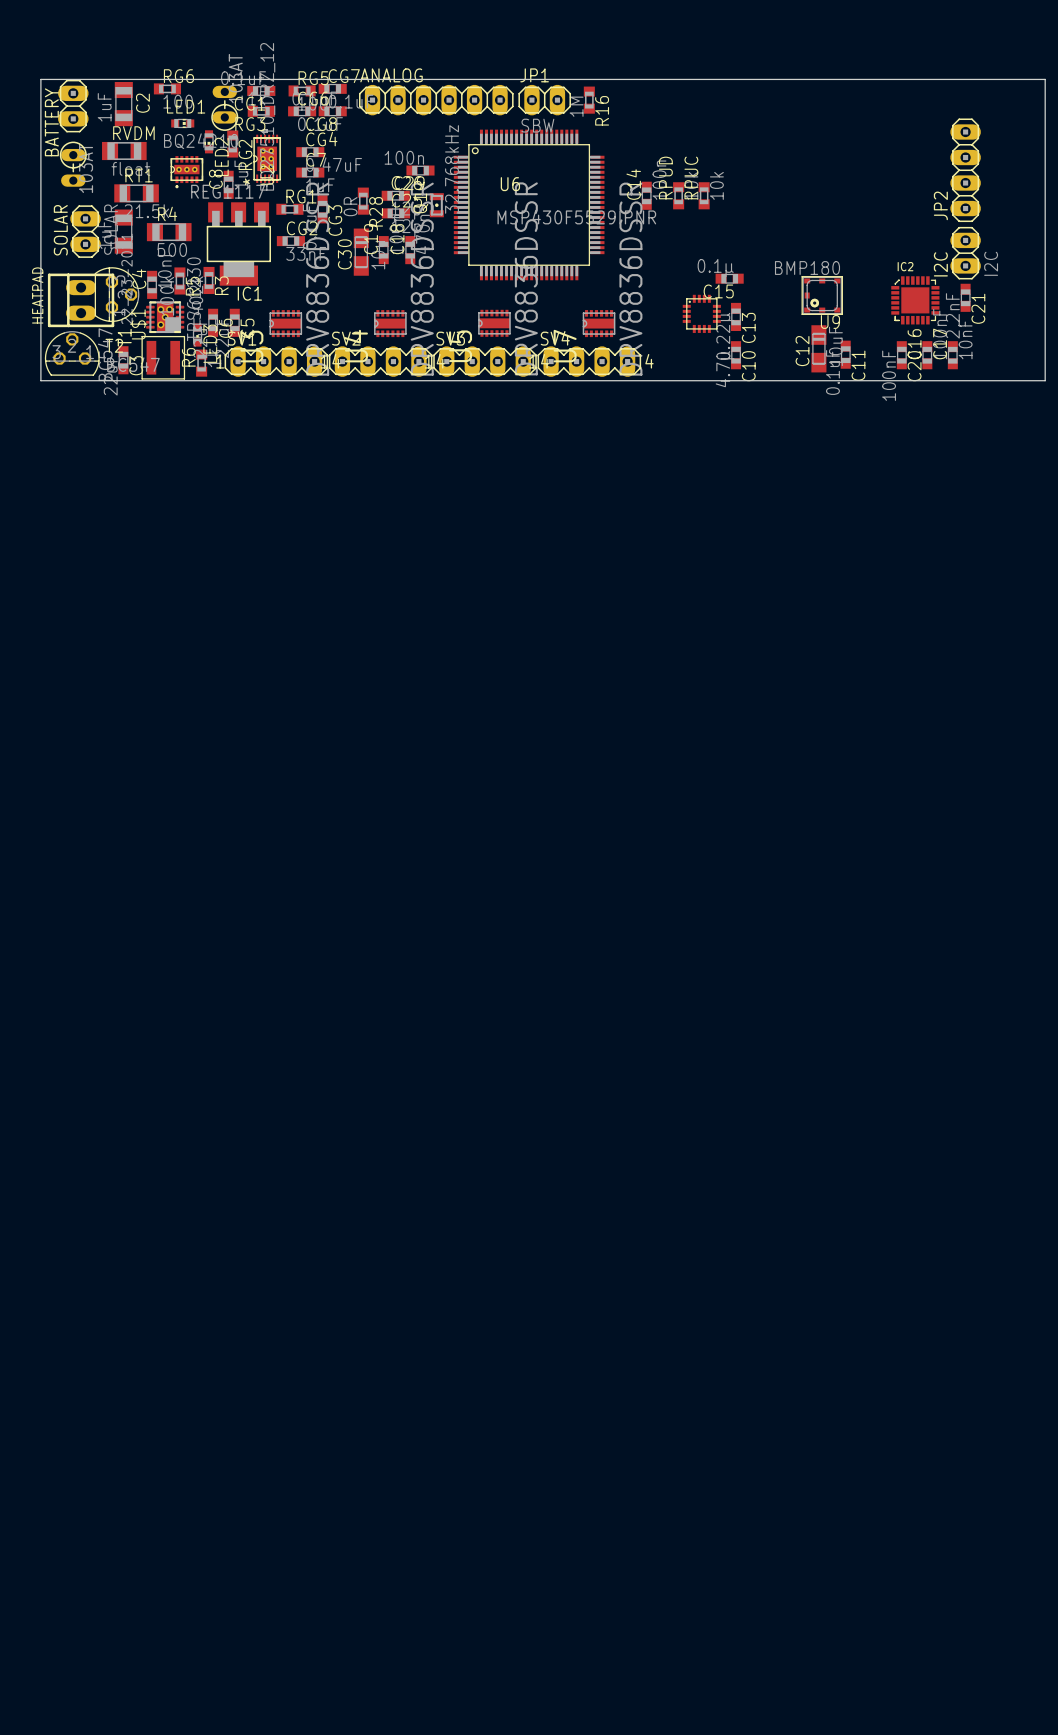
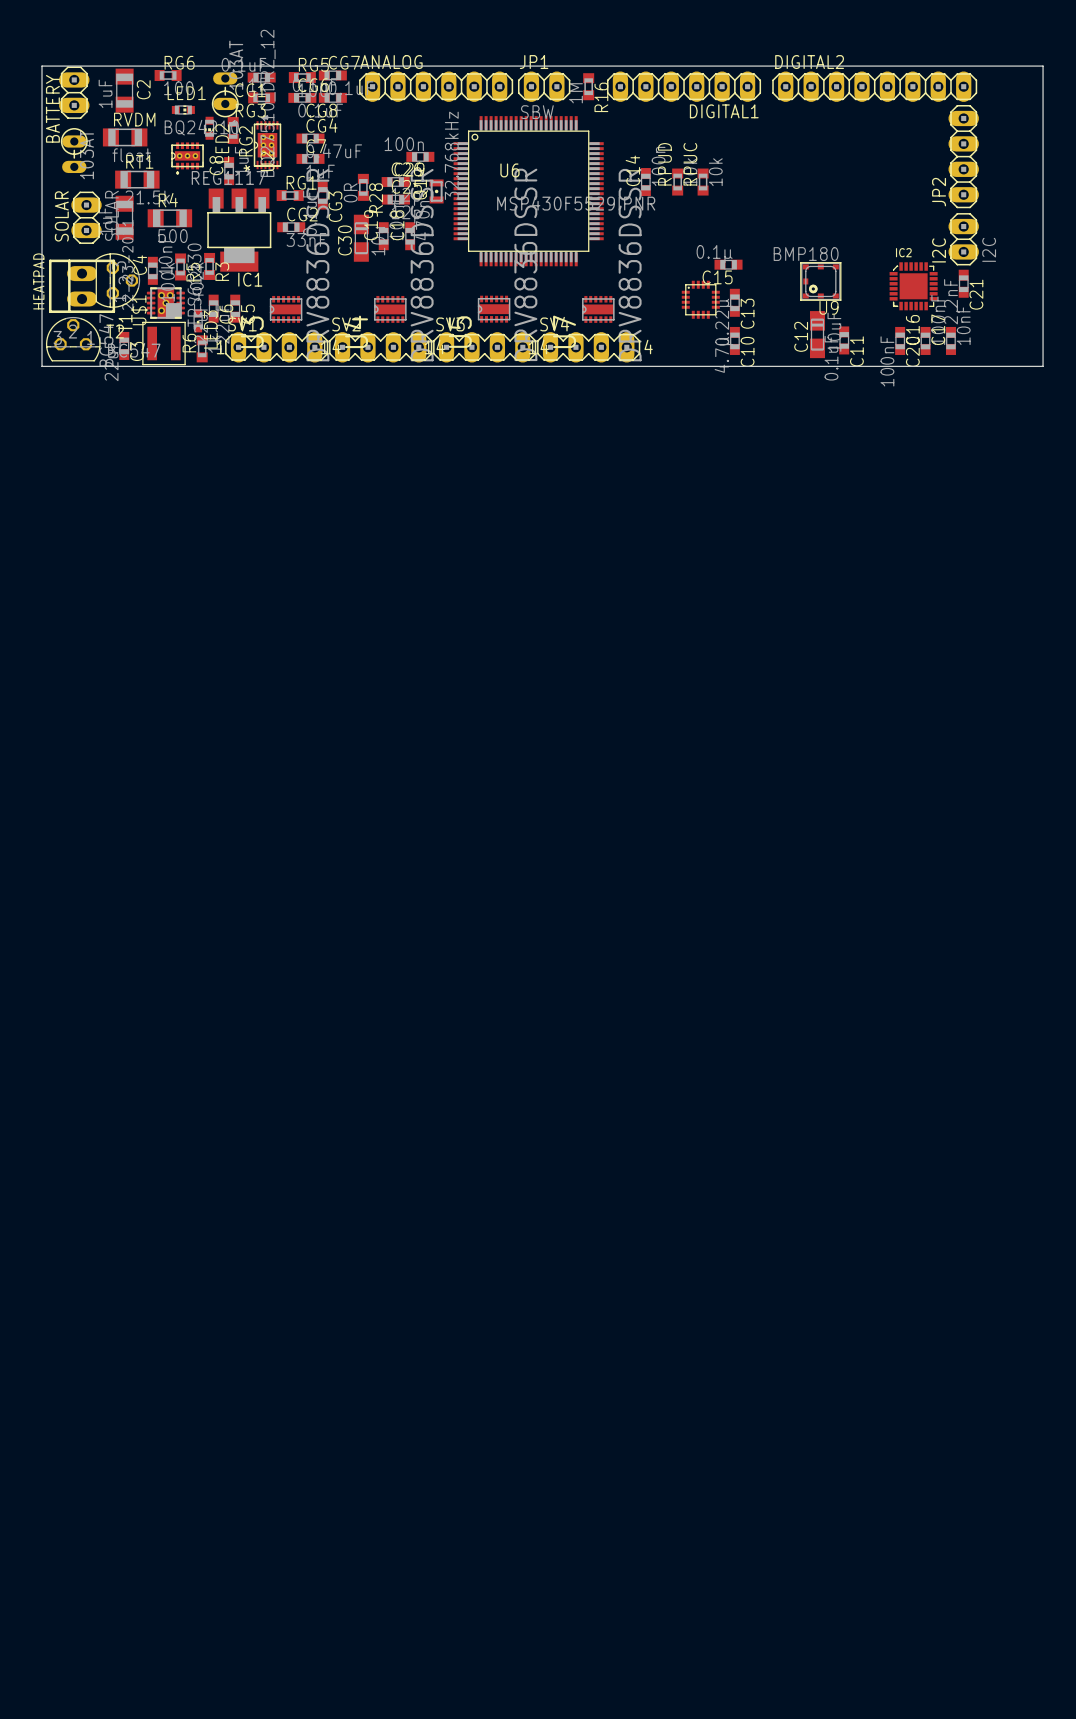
DIGITAL1: none -> (684, 86)
DIGITAL2: none -> (874, 86)

